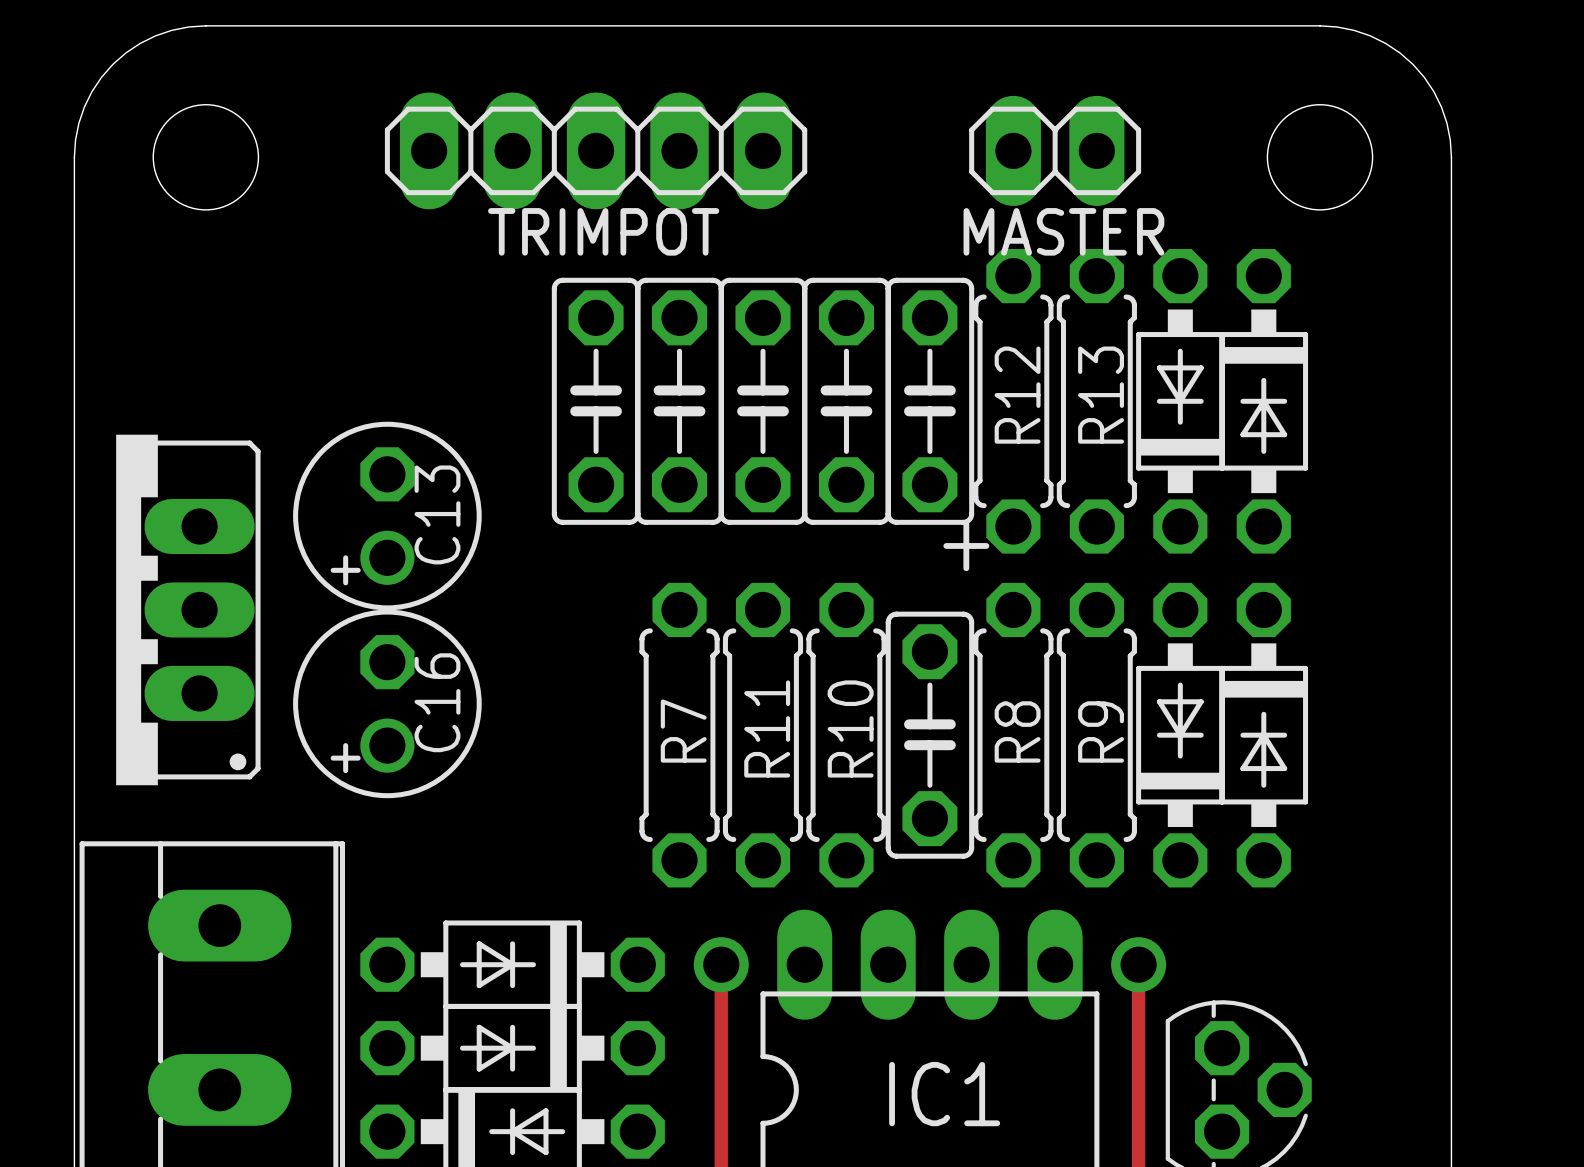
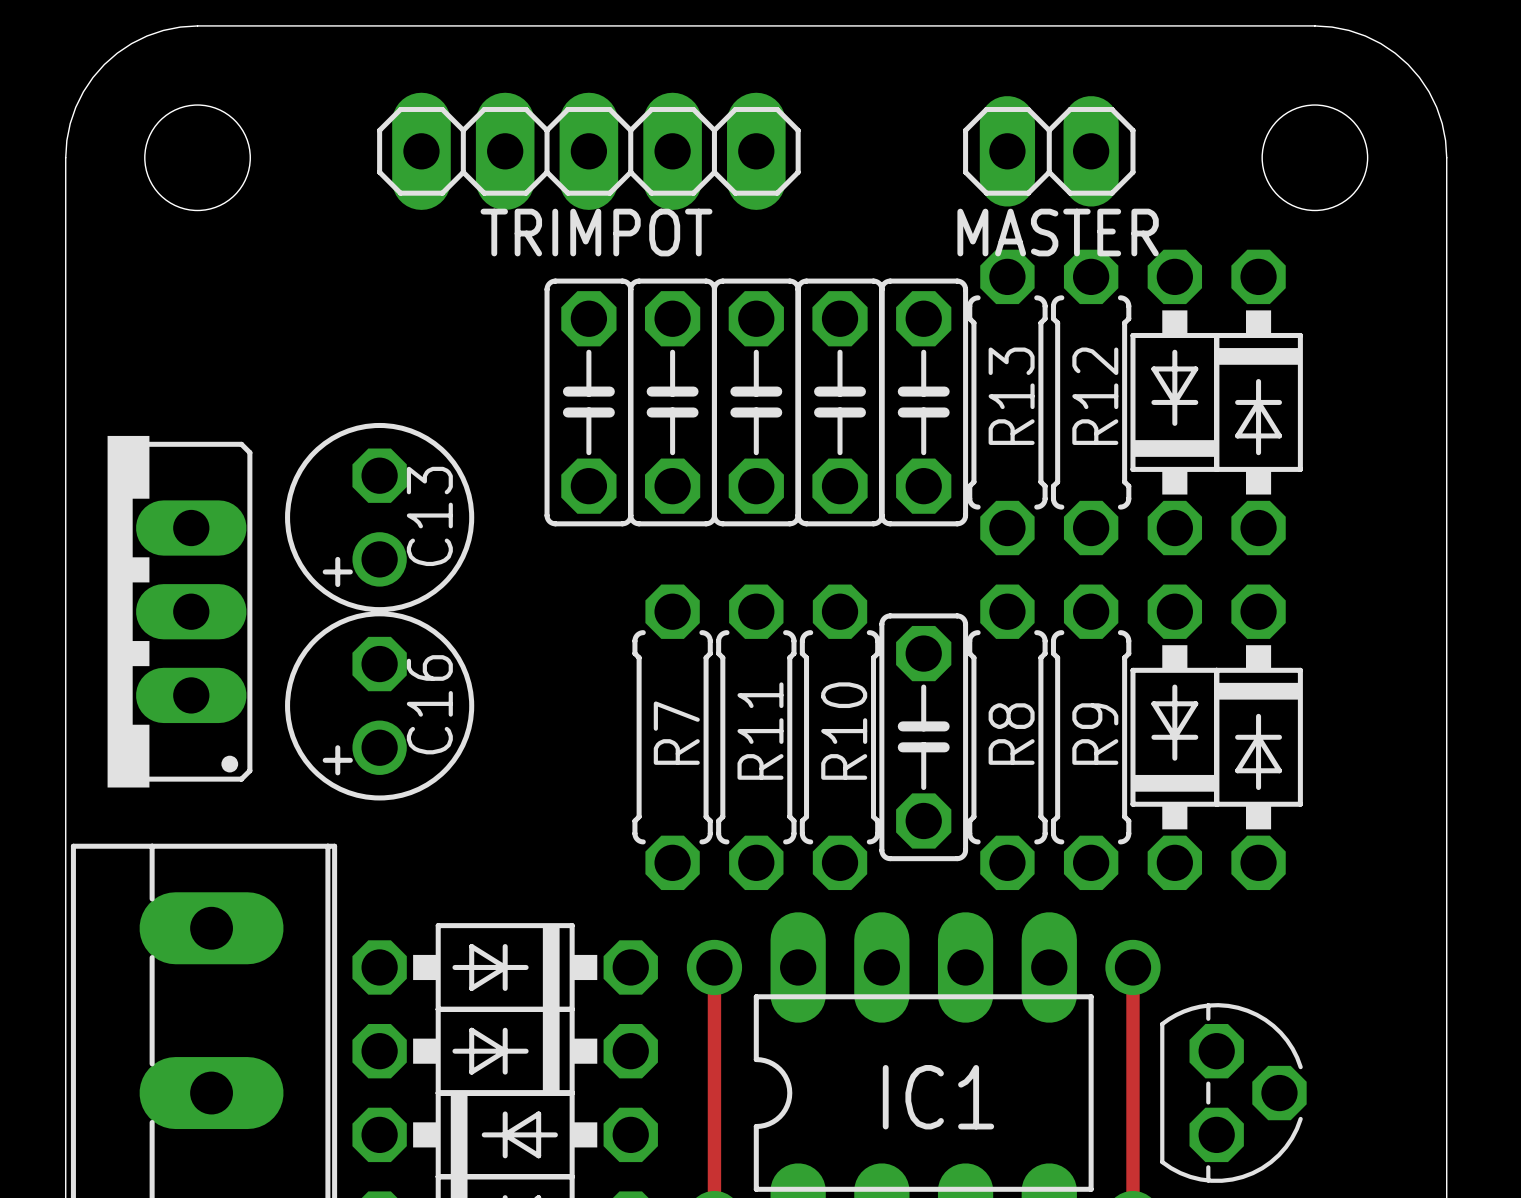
R12 name position: R12 (1017, 395) -> R12 (1095, 396)
R13 name position: R13 (1101, 395) -> R13 (1011, 396)
text: + (966, 545) -> none

